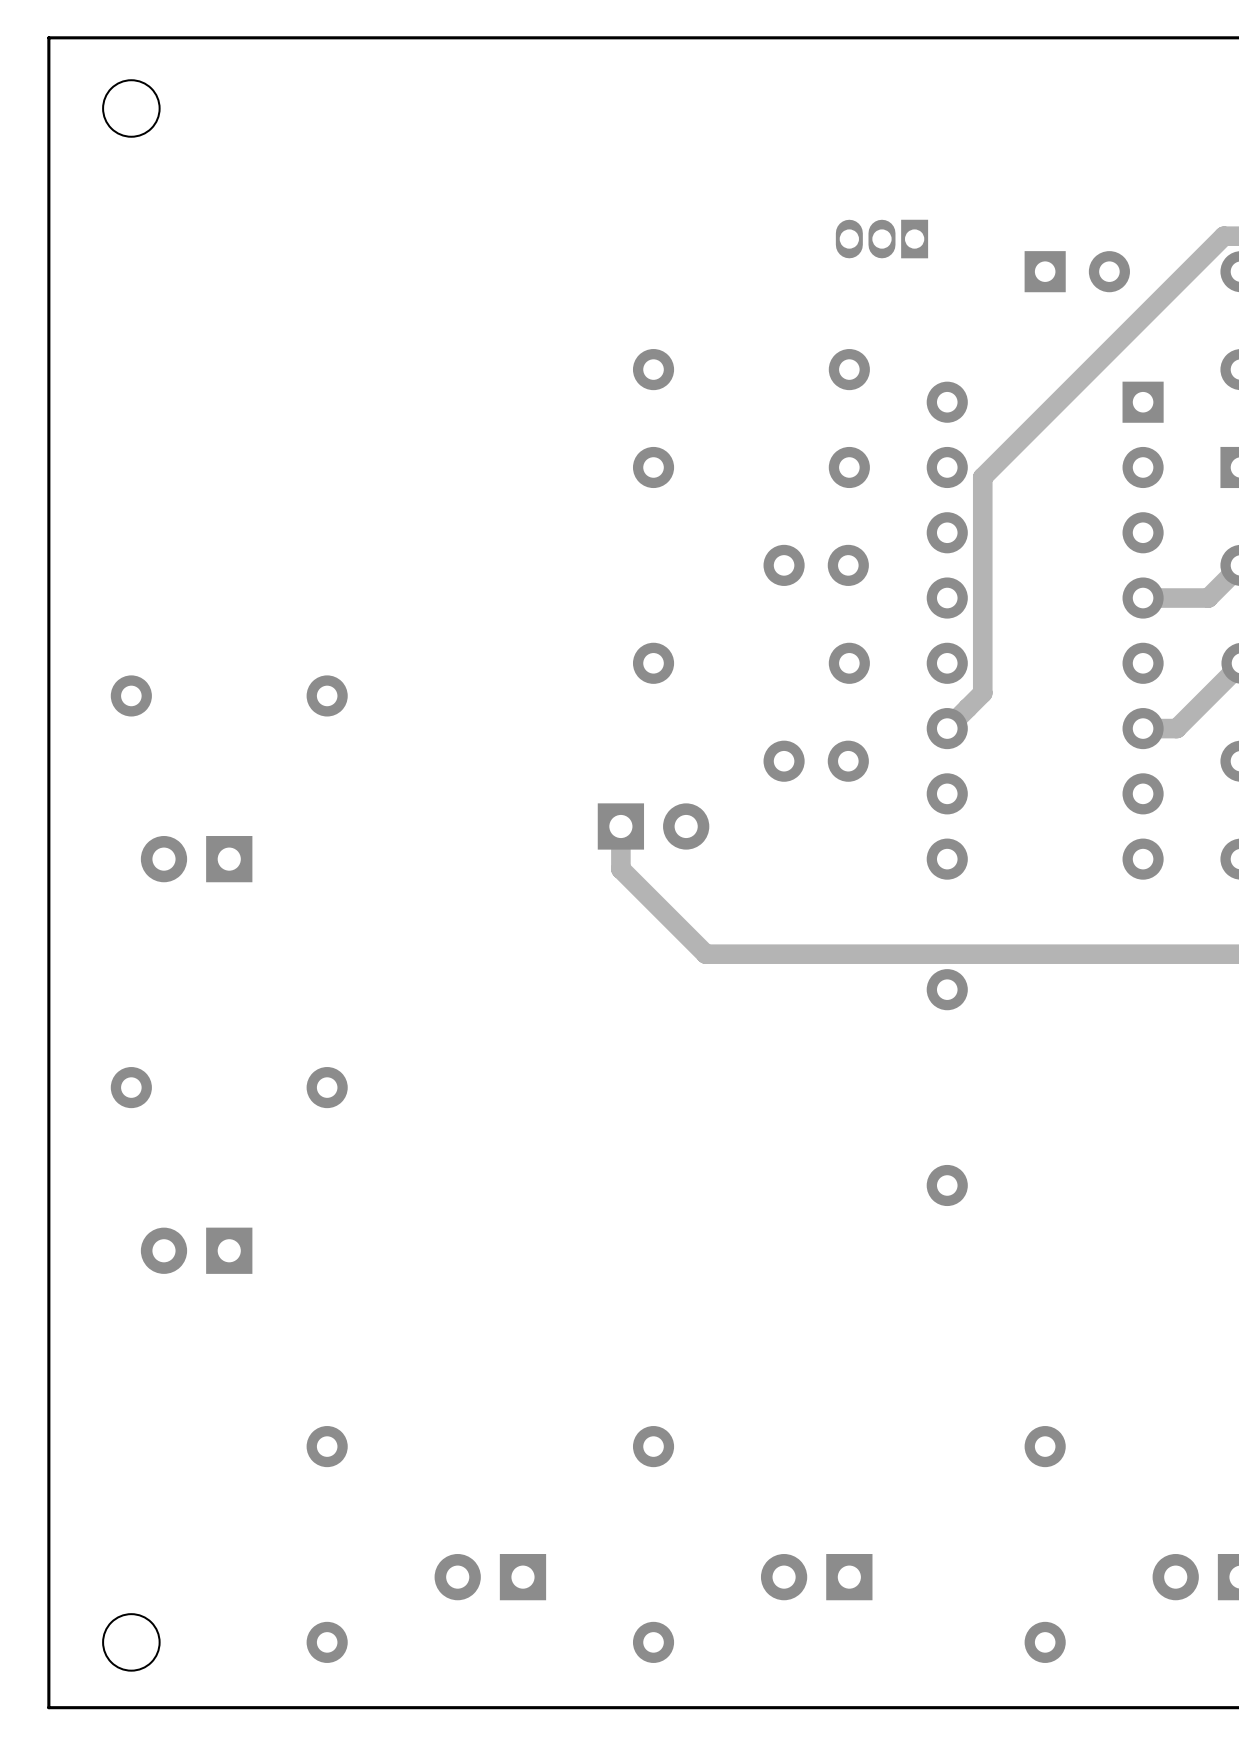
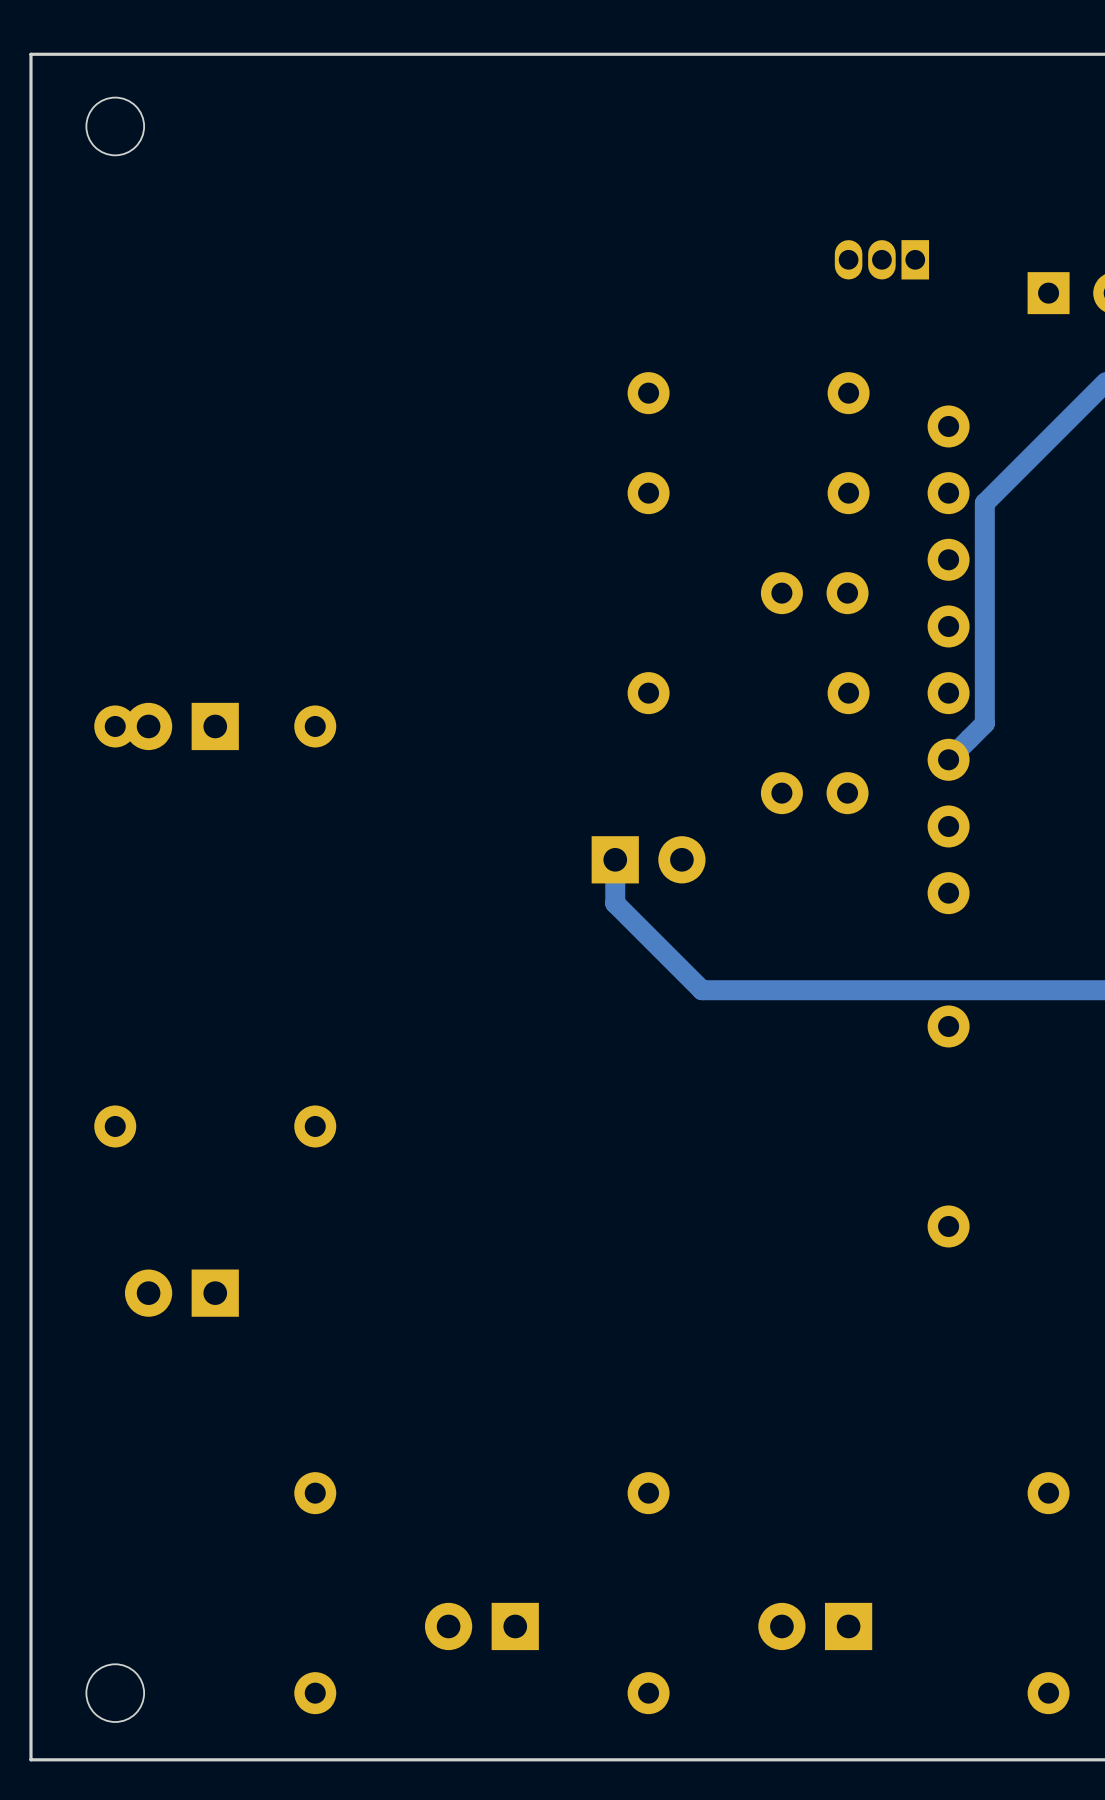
part position: (196, 859) -> (181, 726)

